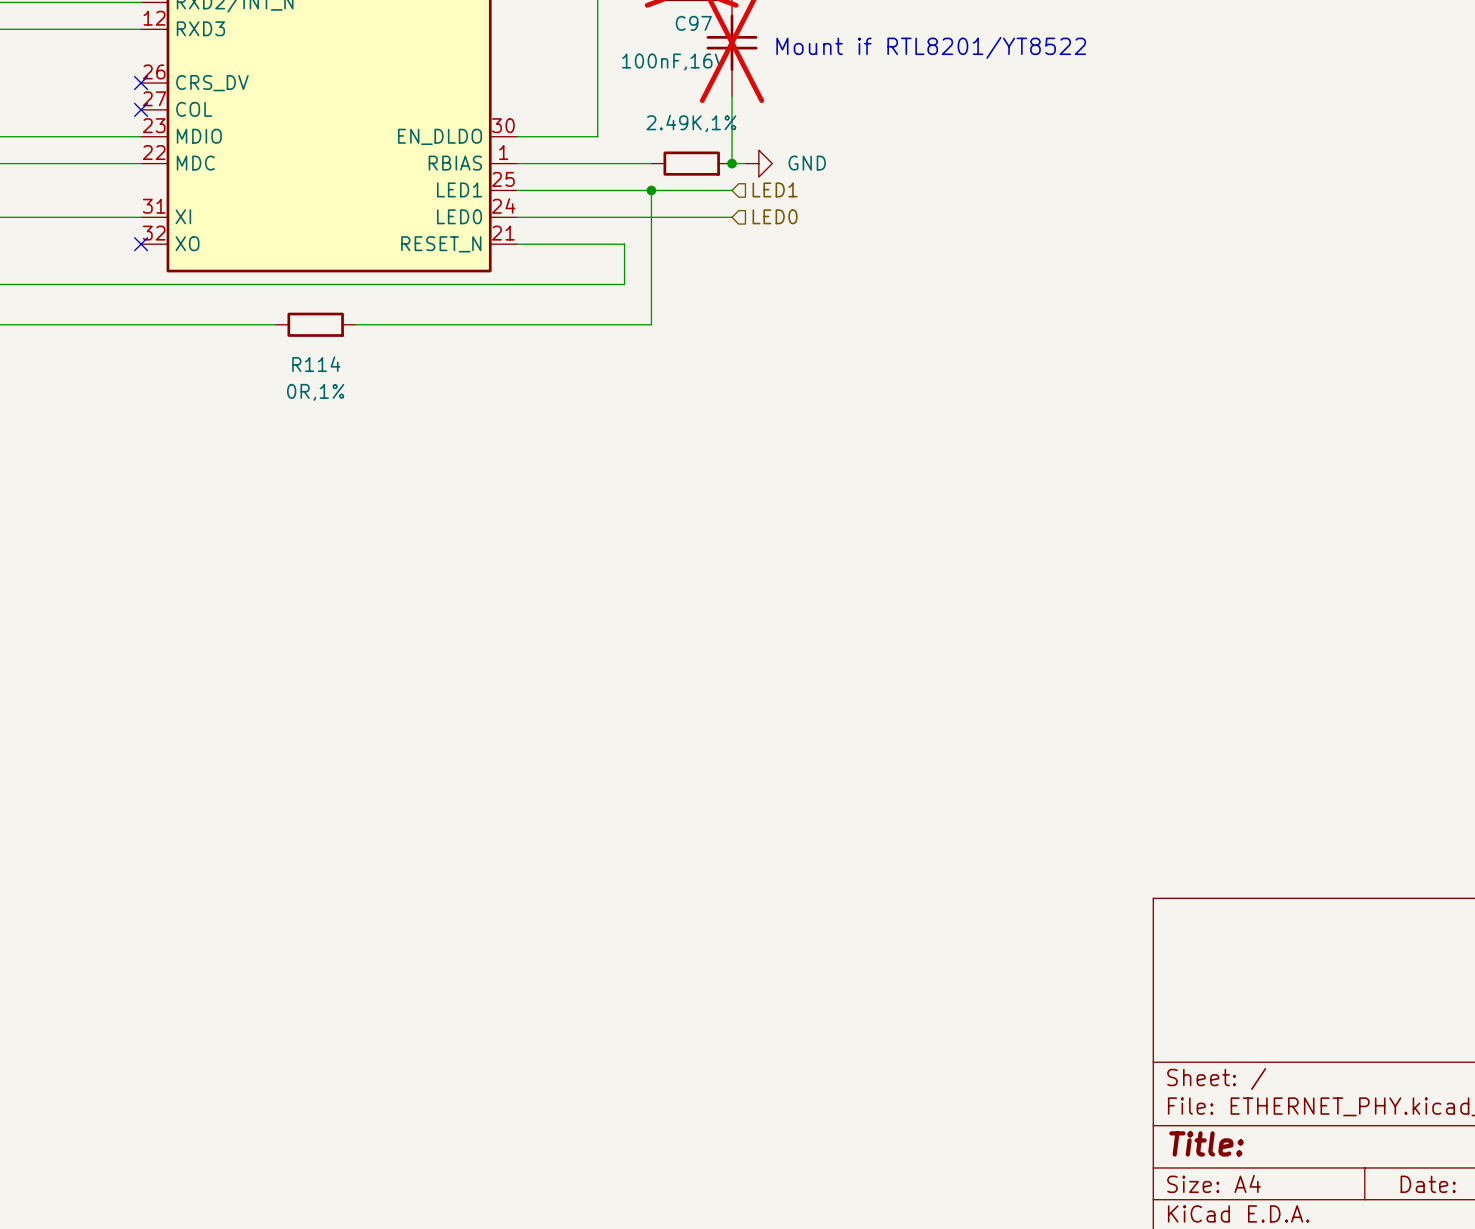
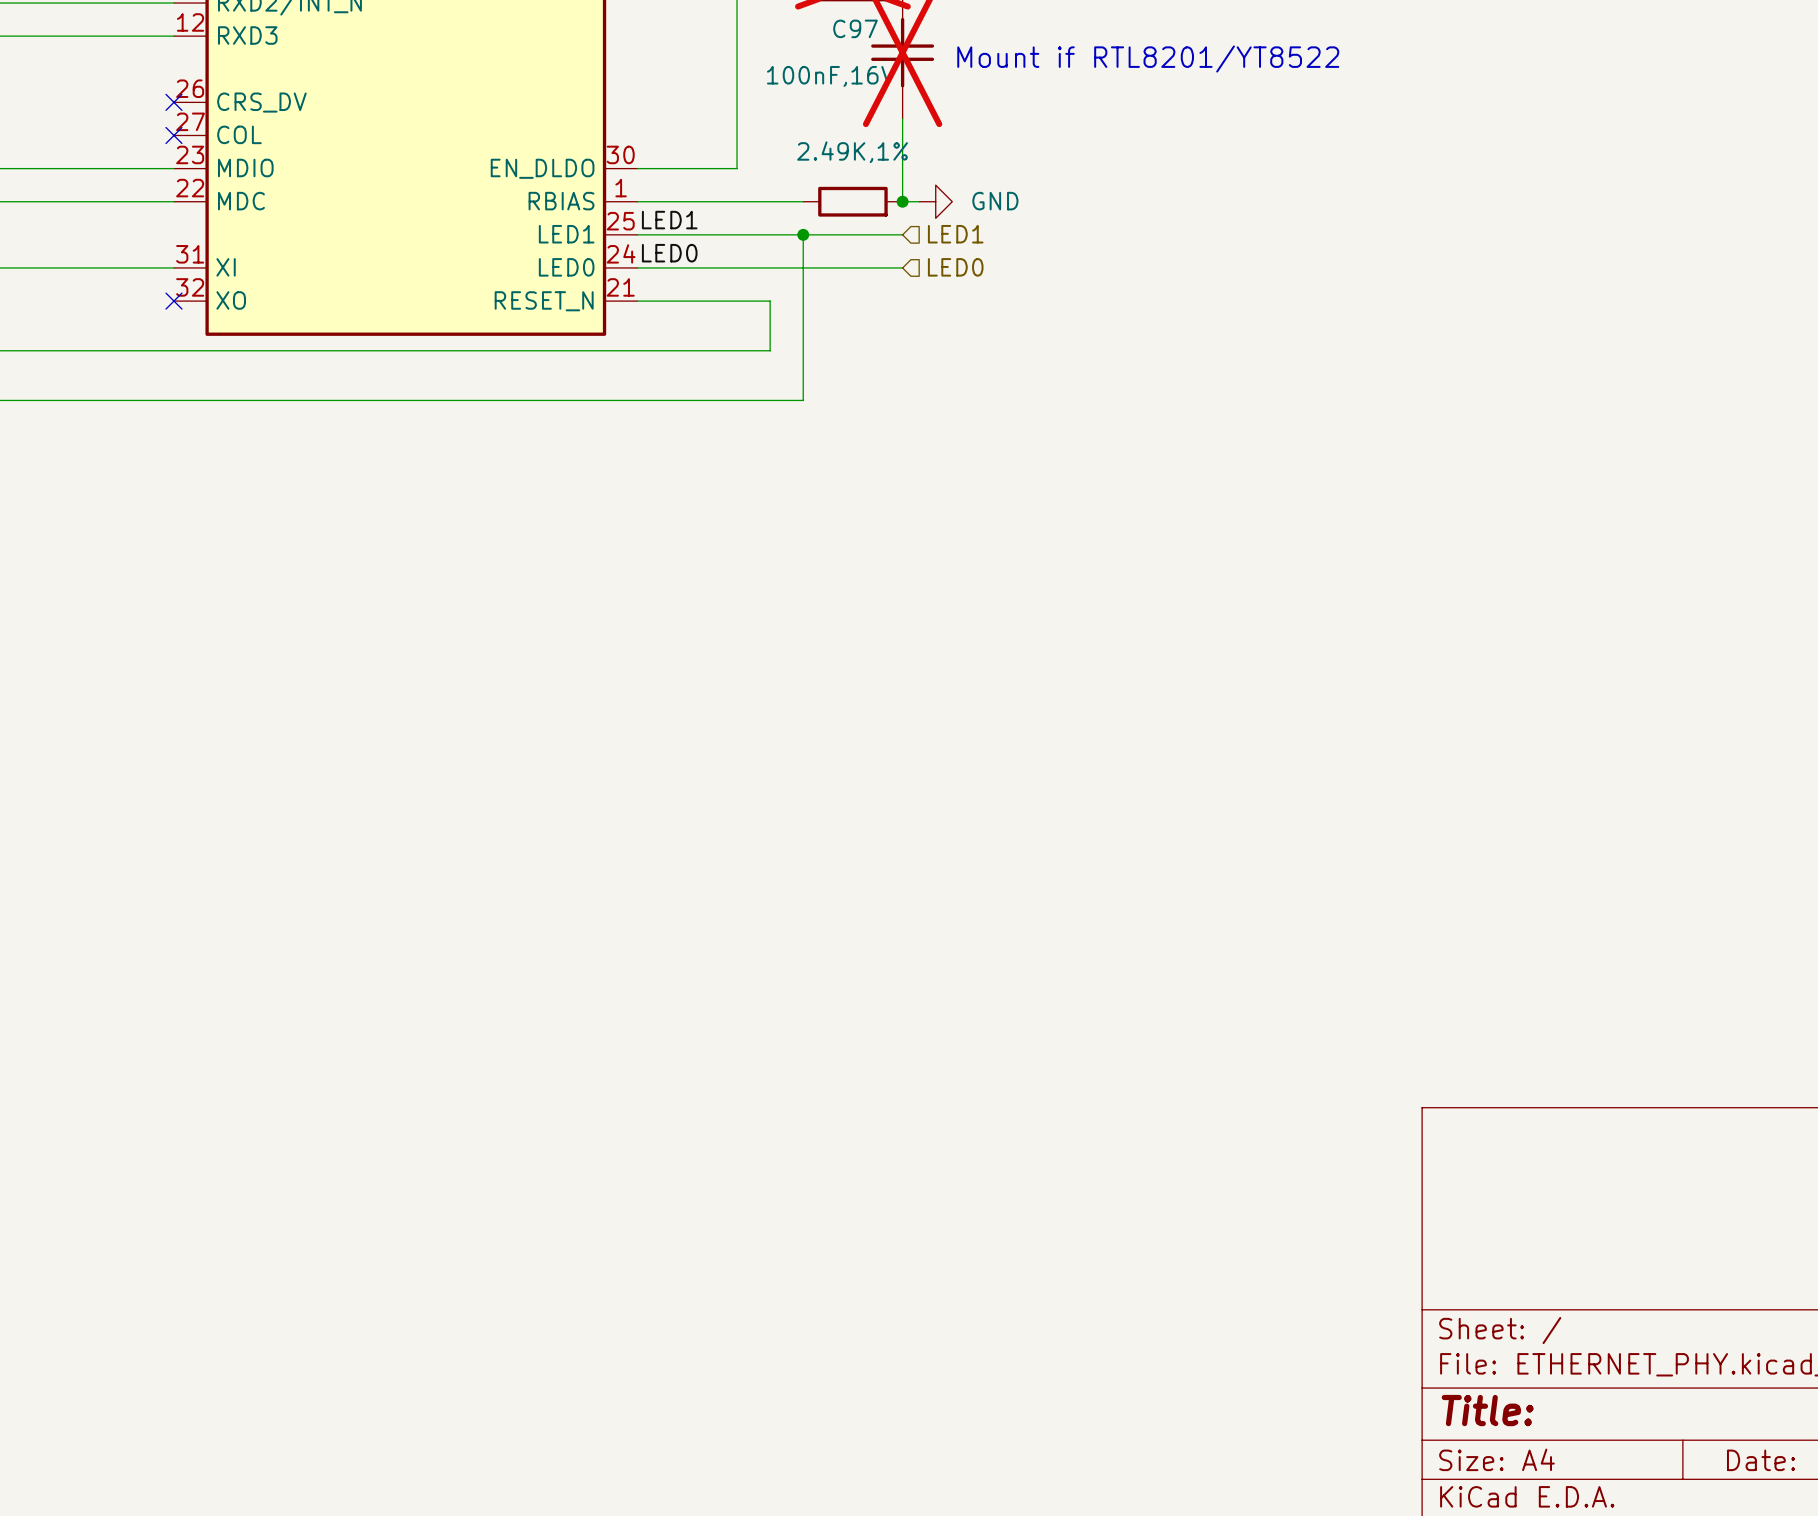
label: none -> LED1 (669, 220)
label: none -> LED0 (669, 253)
wire: none -> (339, 400) (438, 400)
R114: 0R,1% (315, 324) -> none

